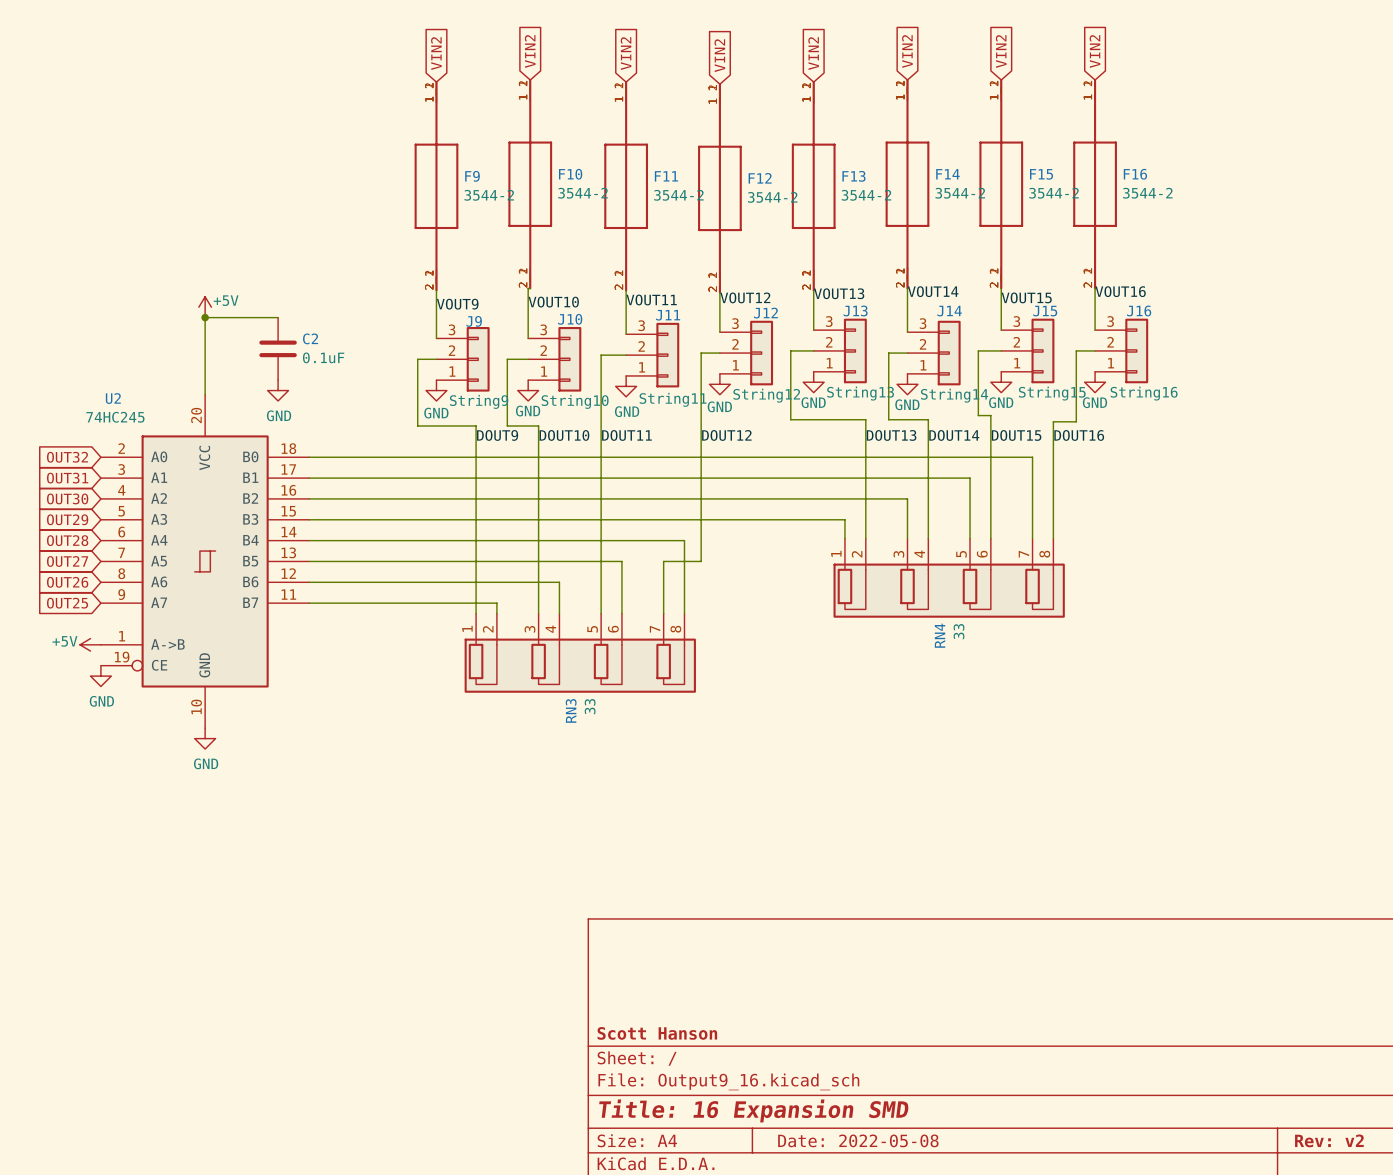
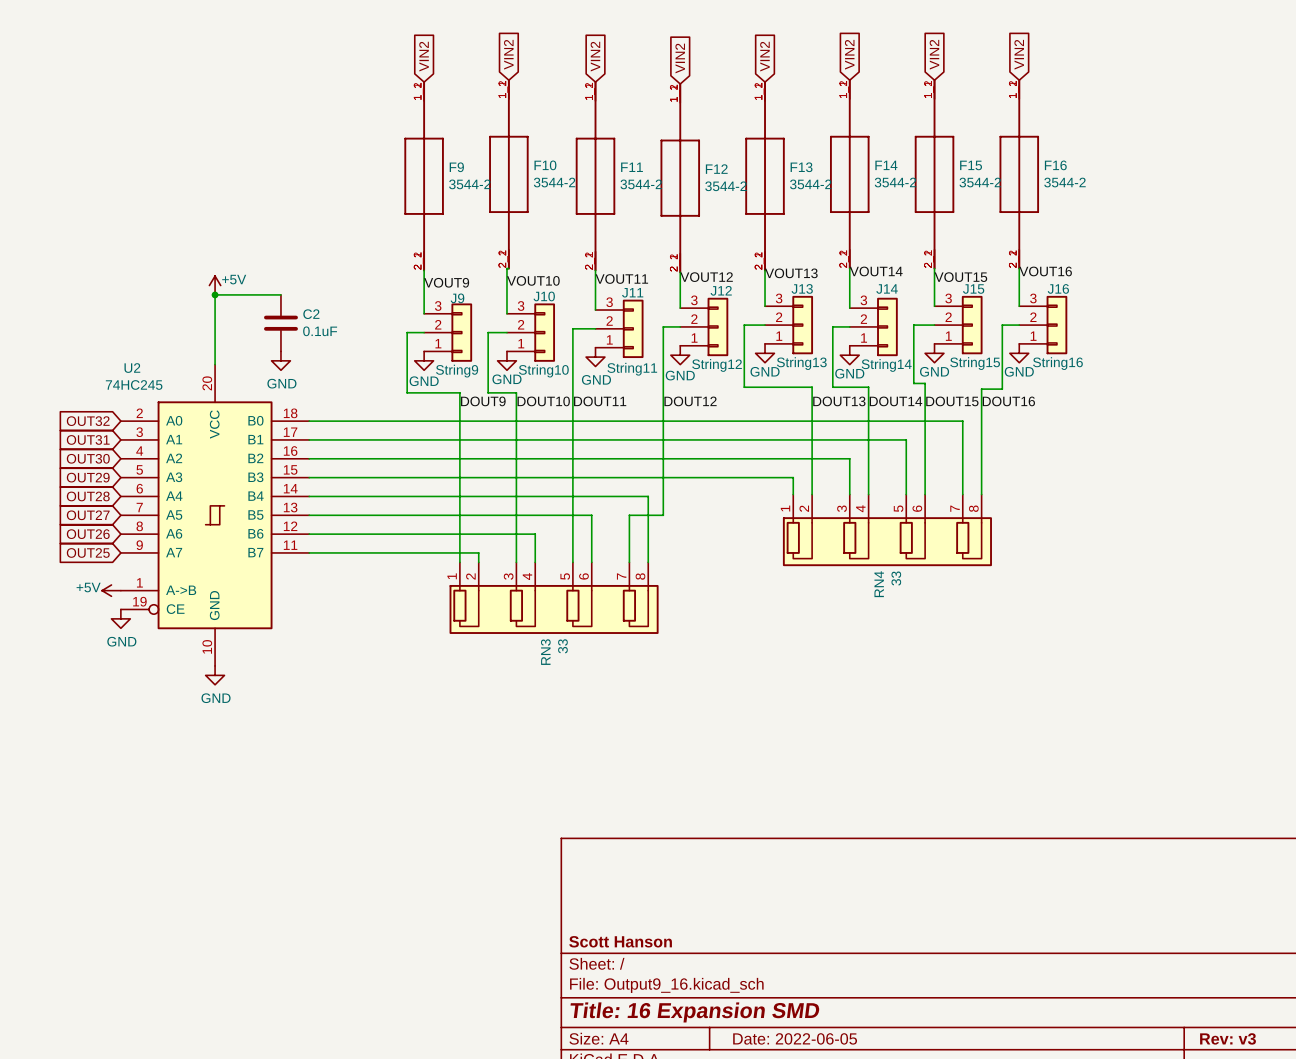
title block: Date: 2022-05-08 (858, 1140) -> Date: 2022-06-05 (795, 1038)
title block: Rev: v2 (1329, 1140) -> Rev: v3 (1228, 1038)

